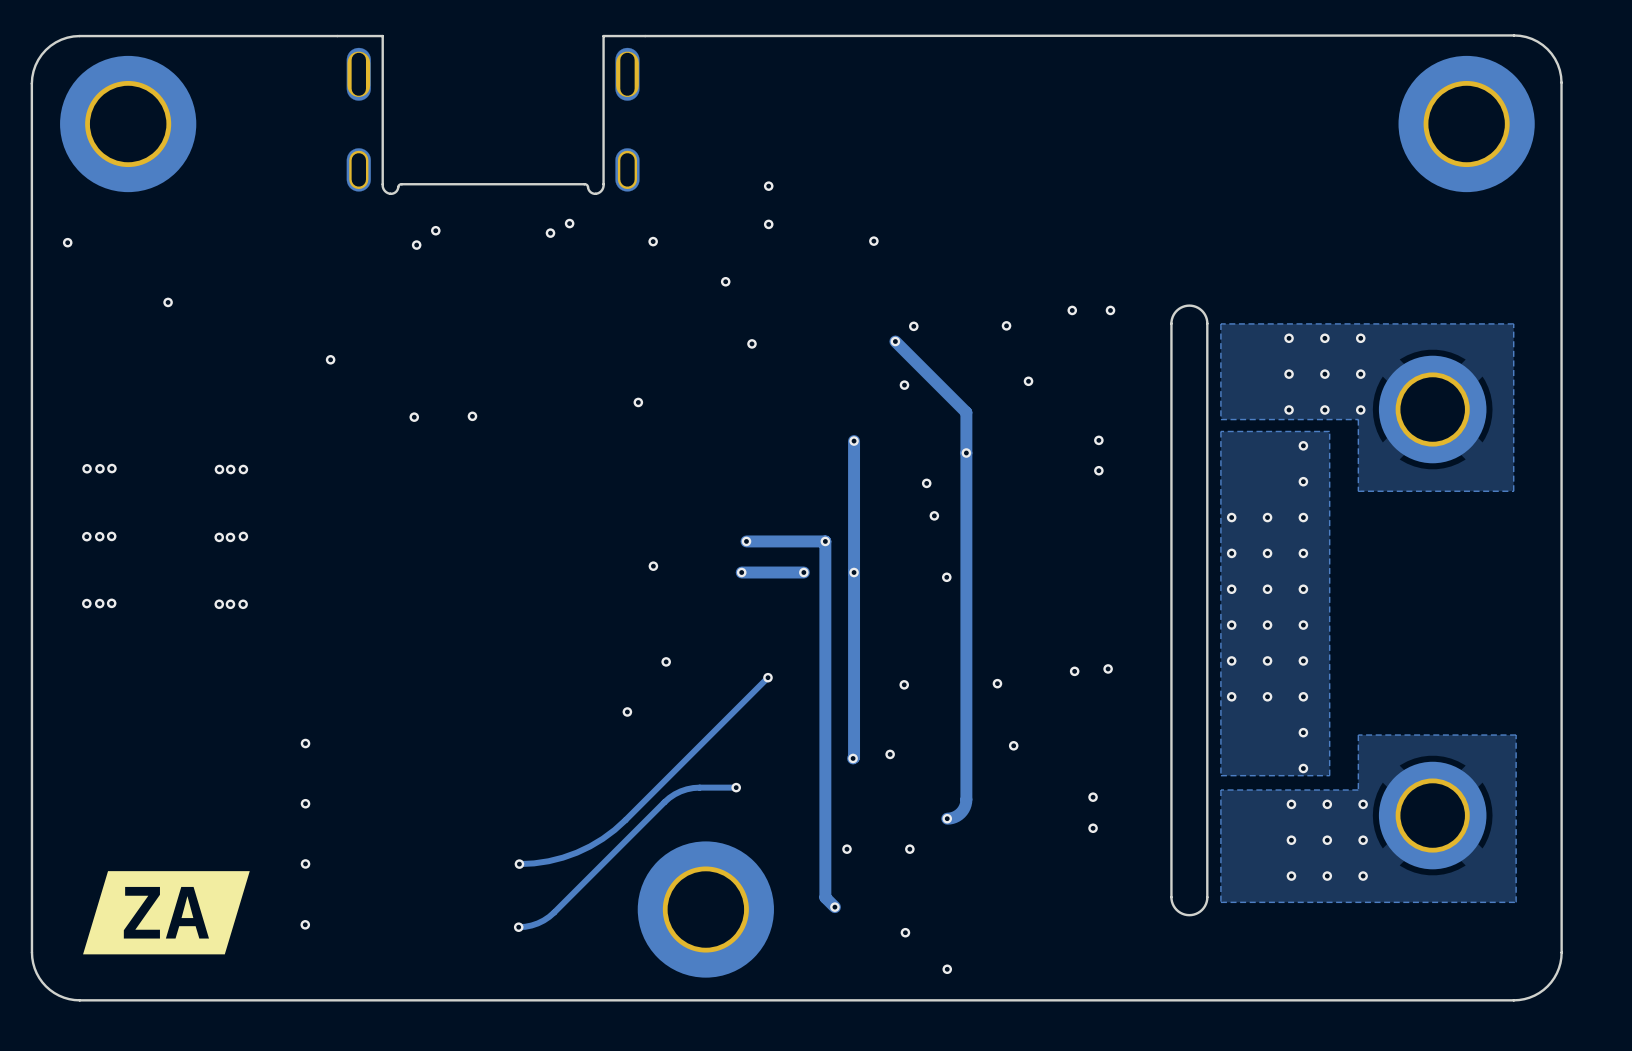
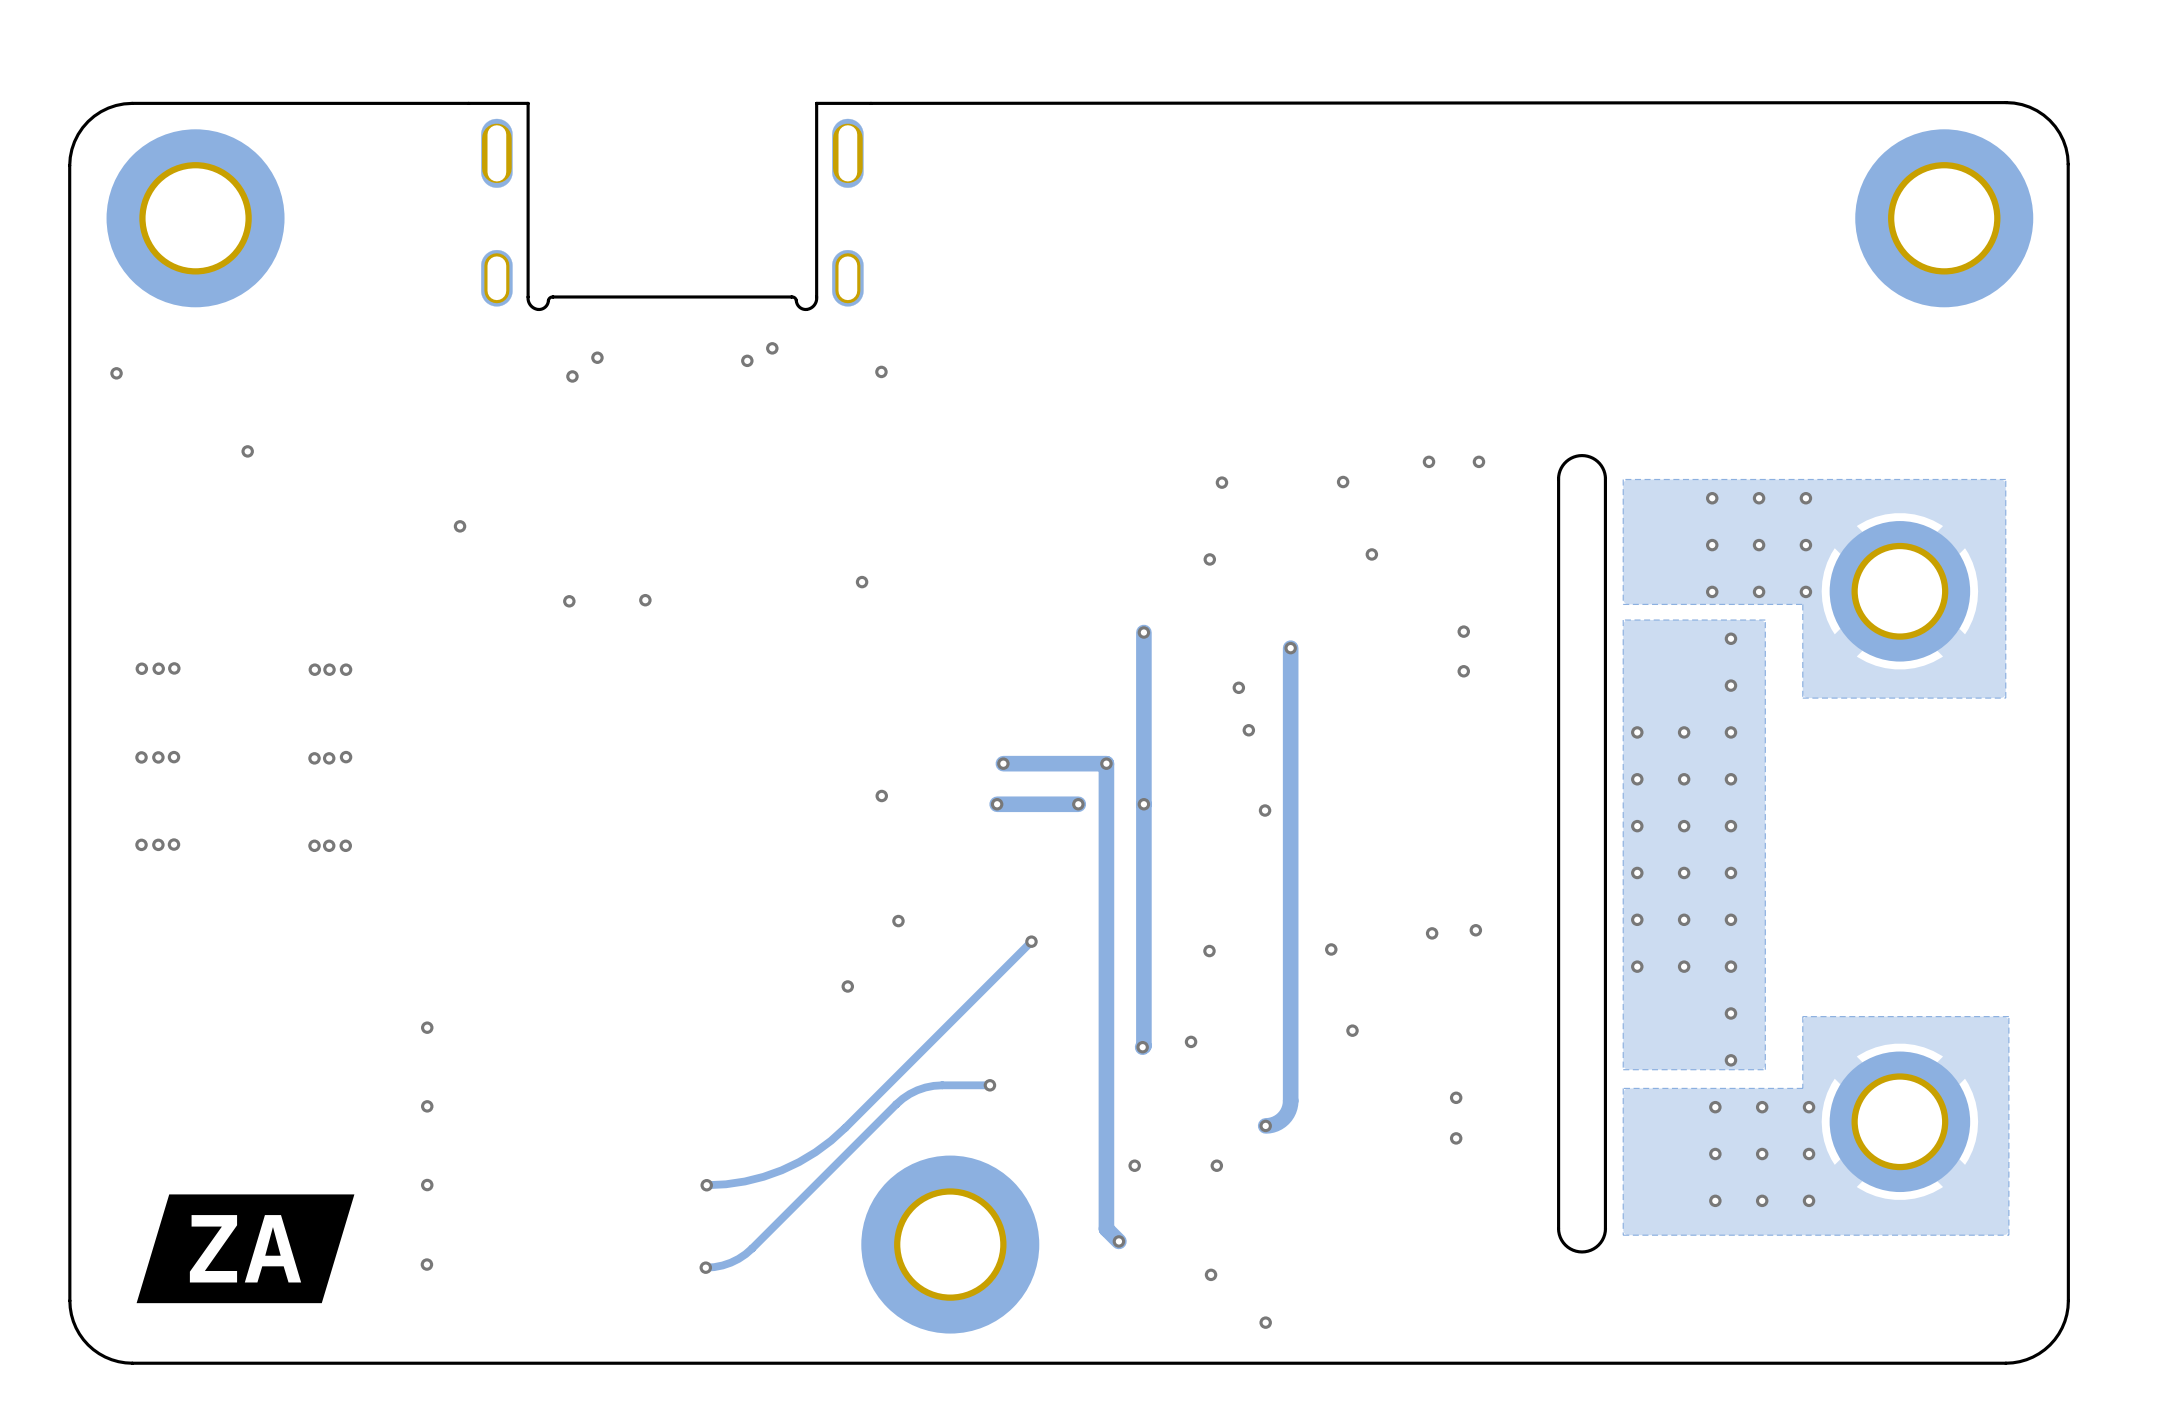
via: (768, 186) -> none
via: (768, 224) -> none
via: (873, 241) -> none
via: (725, 281) -> none
track: (895, 341) (966, 412) (966, 453) -> none
via: (895, 341) -> none
via: (751, 343) -> none

